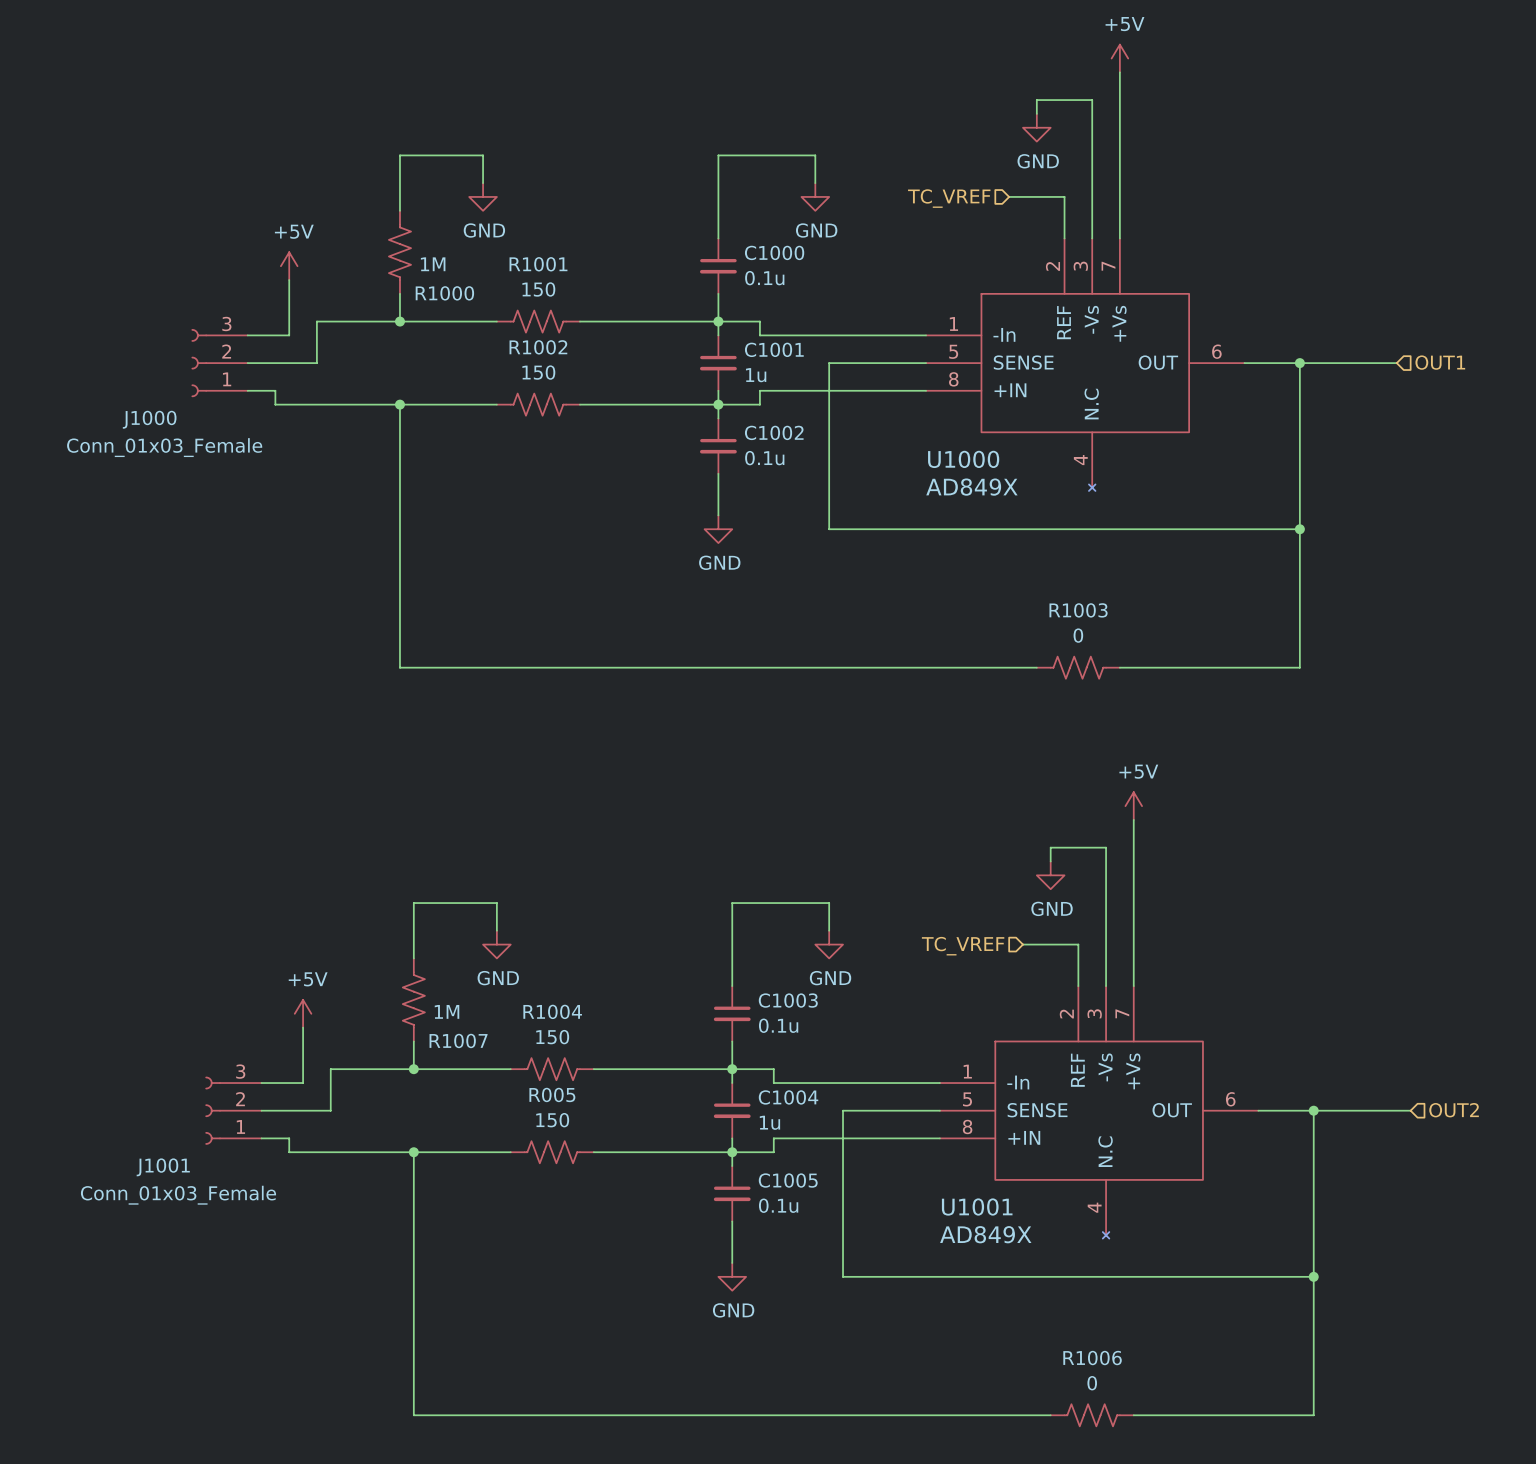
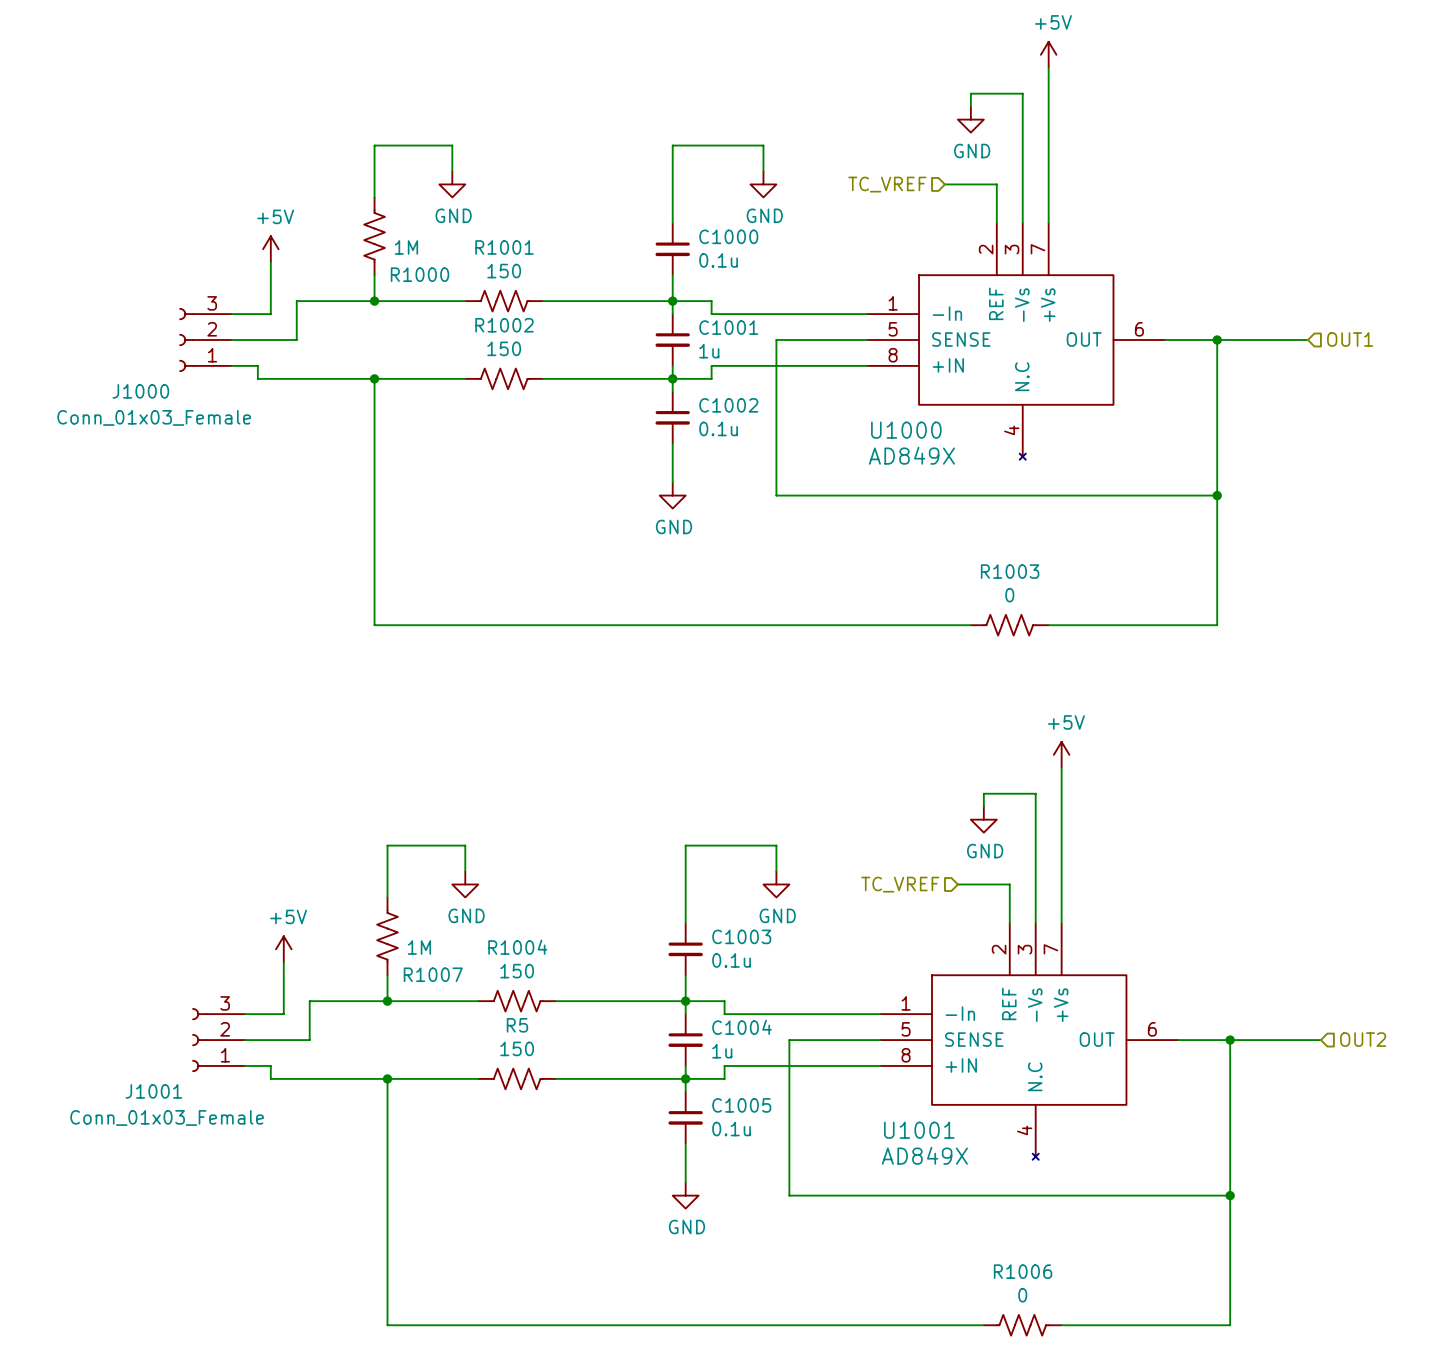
R005 name: R005 (552, 1094) -> R5 (517, 1025)

